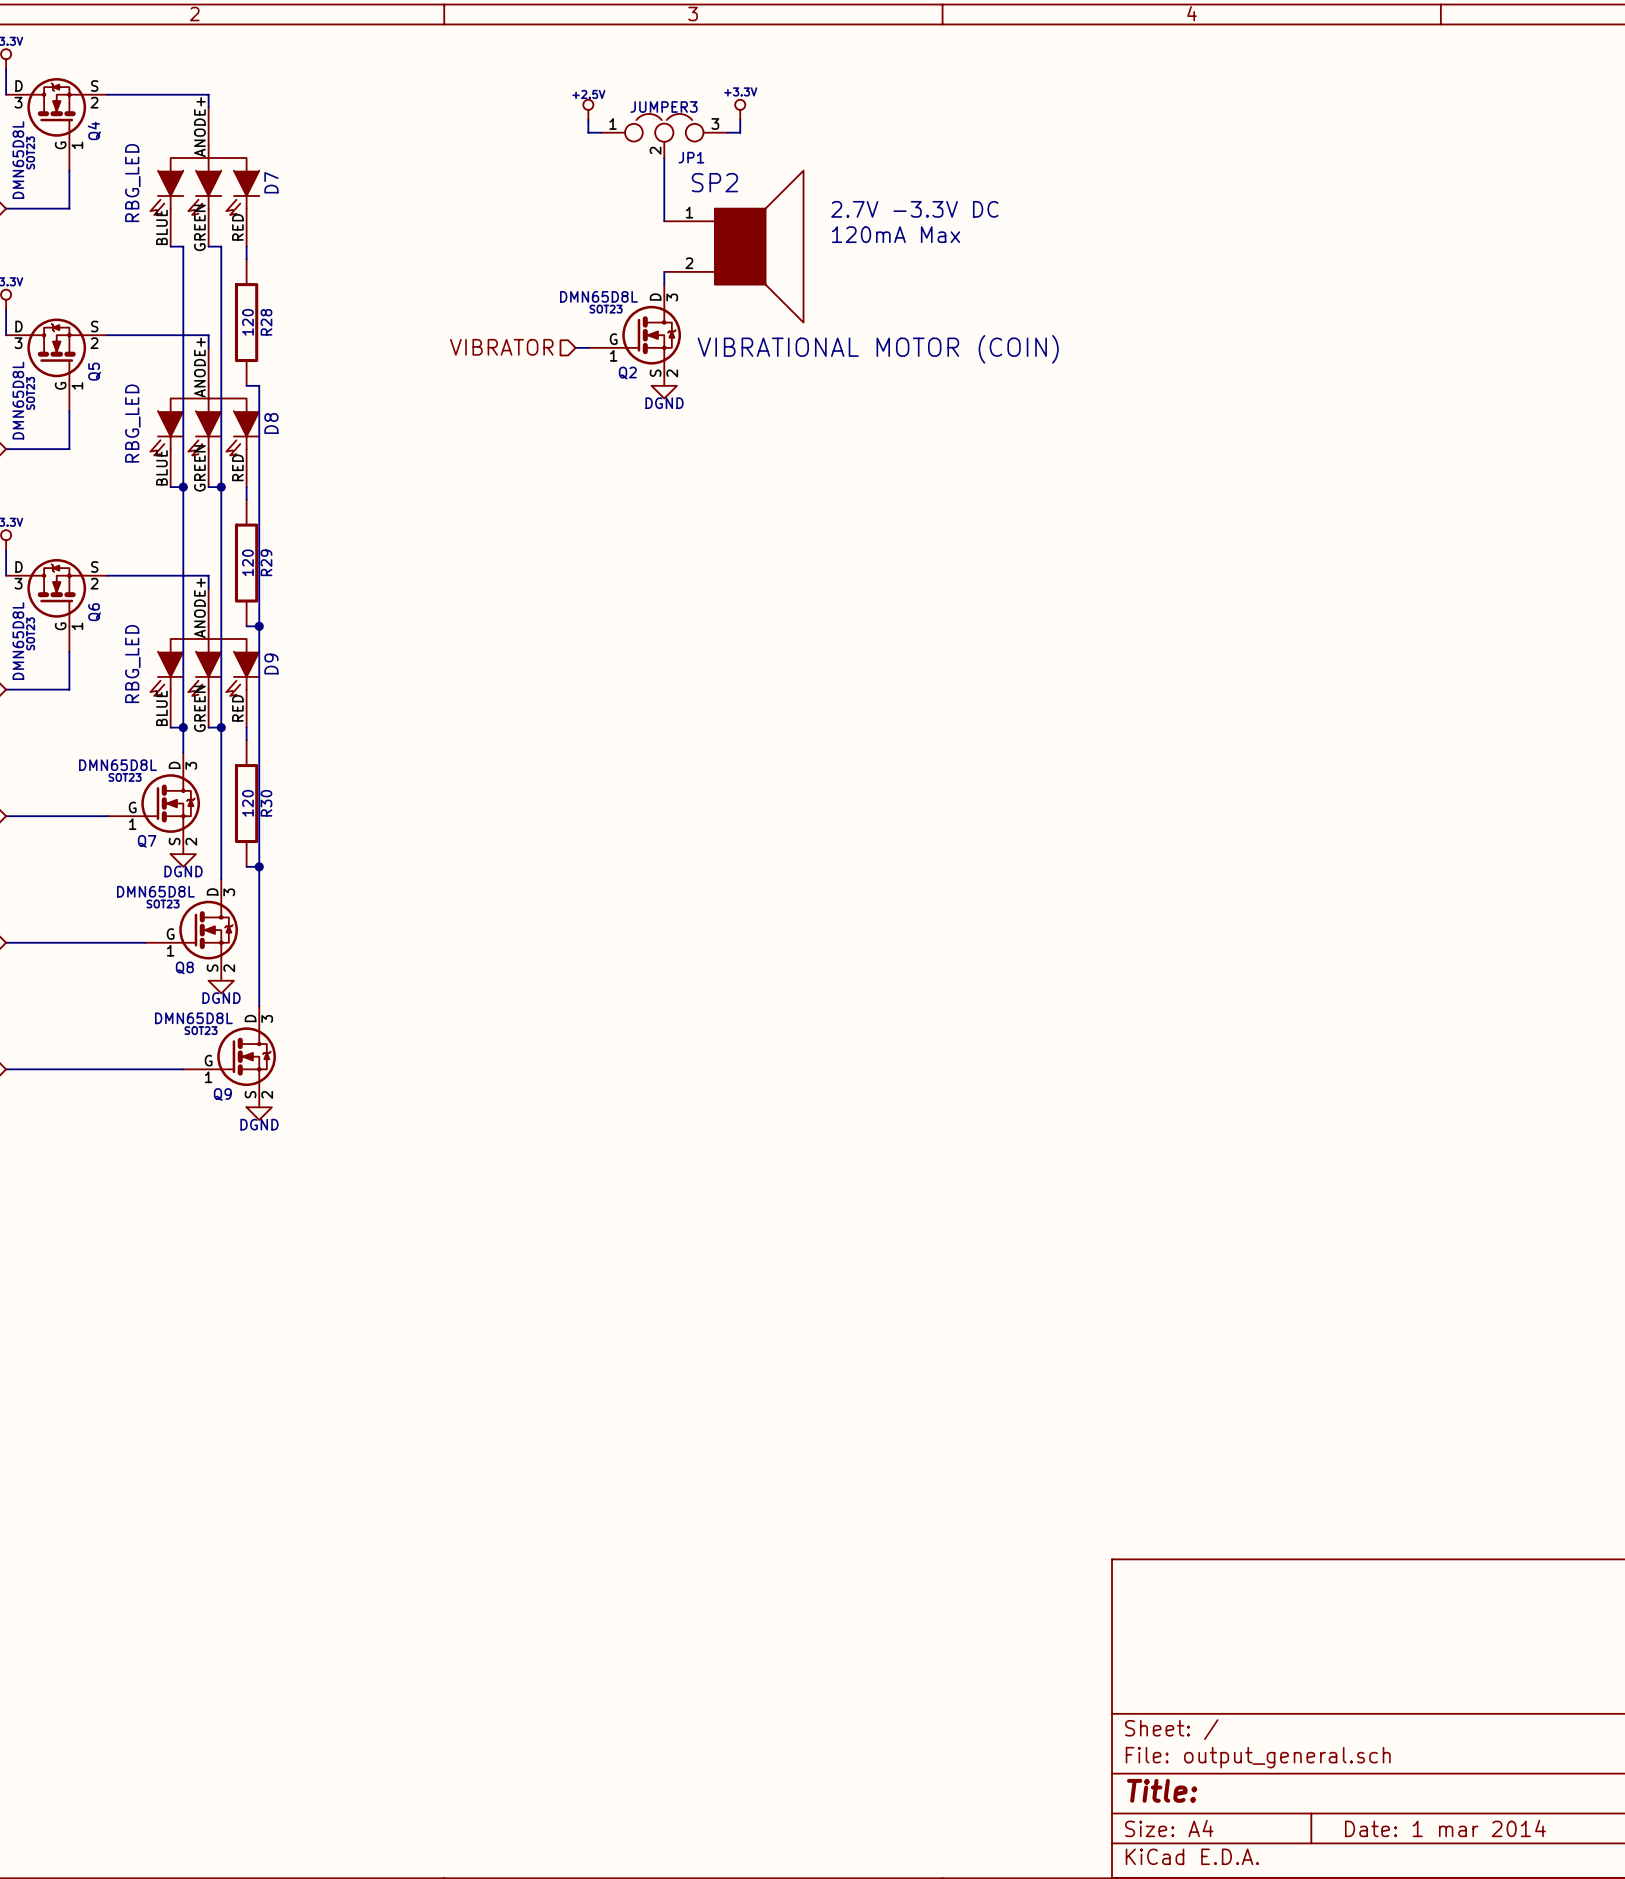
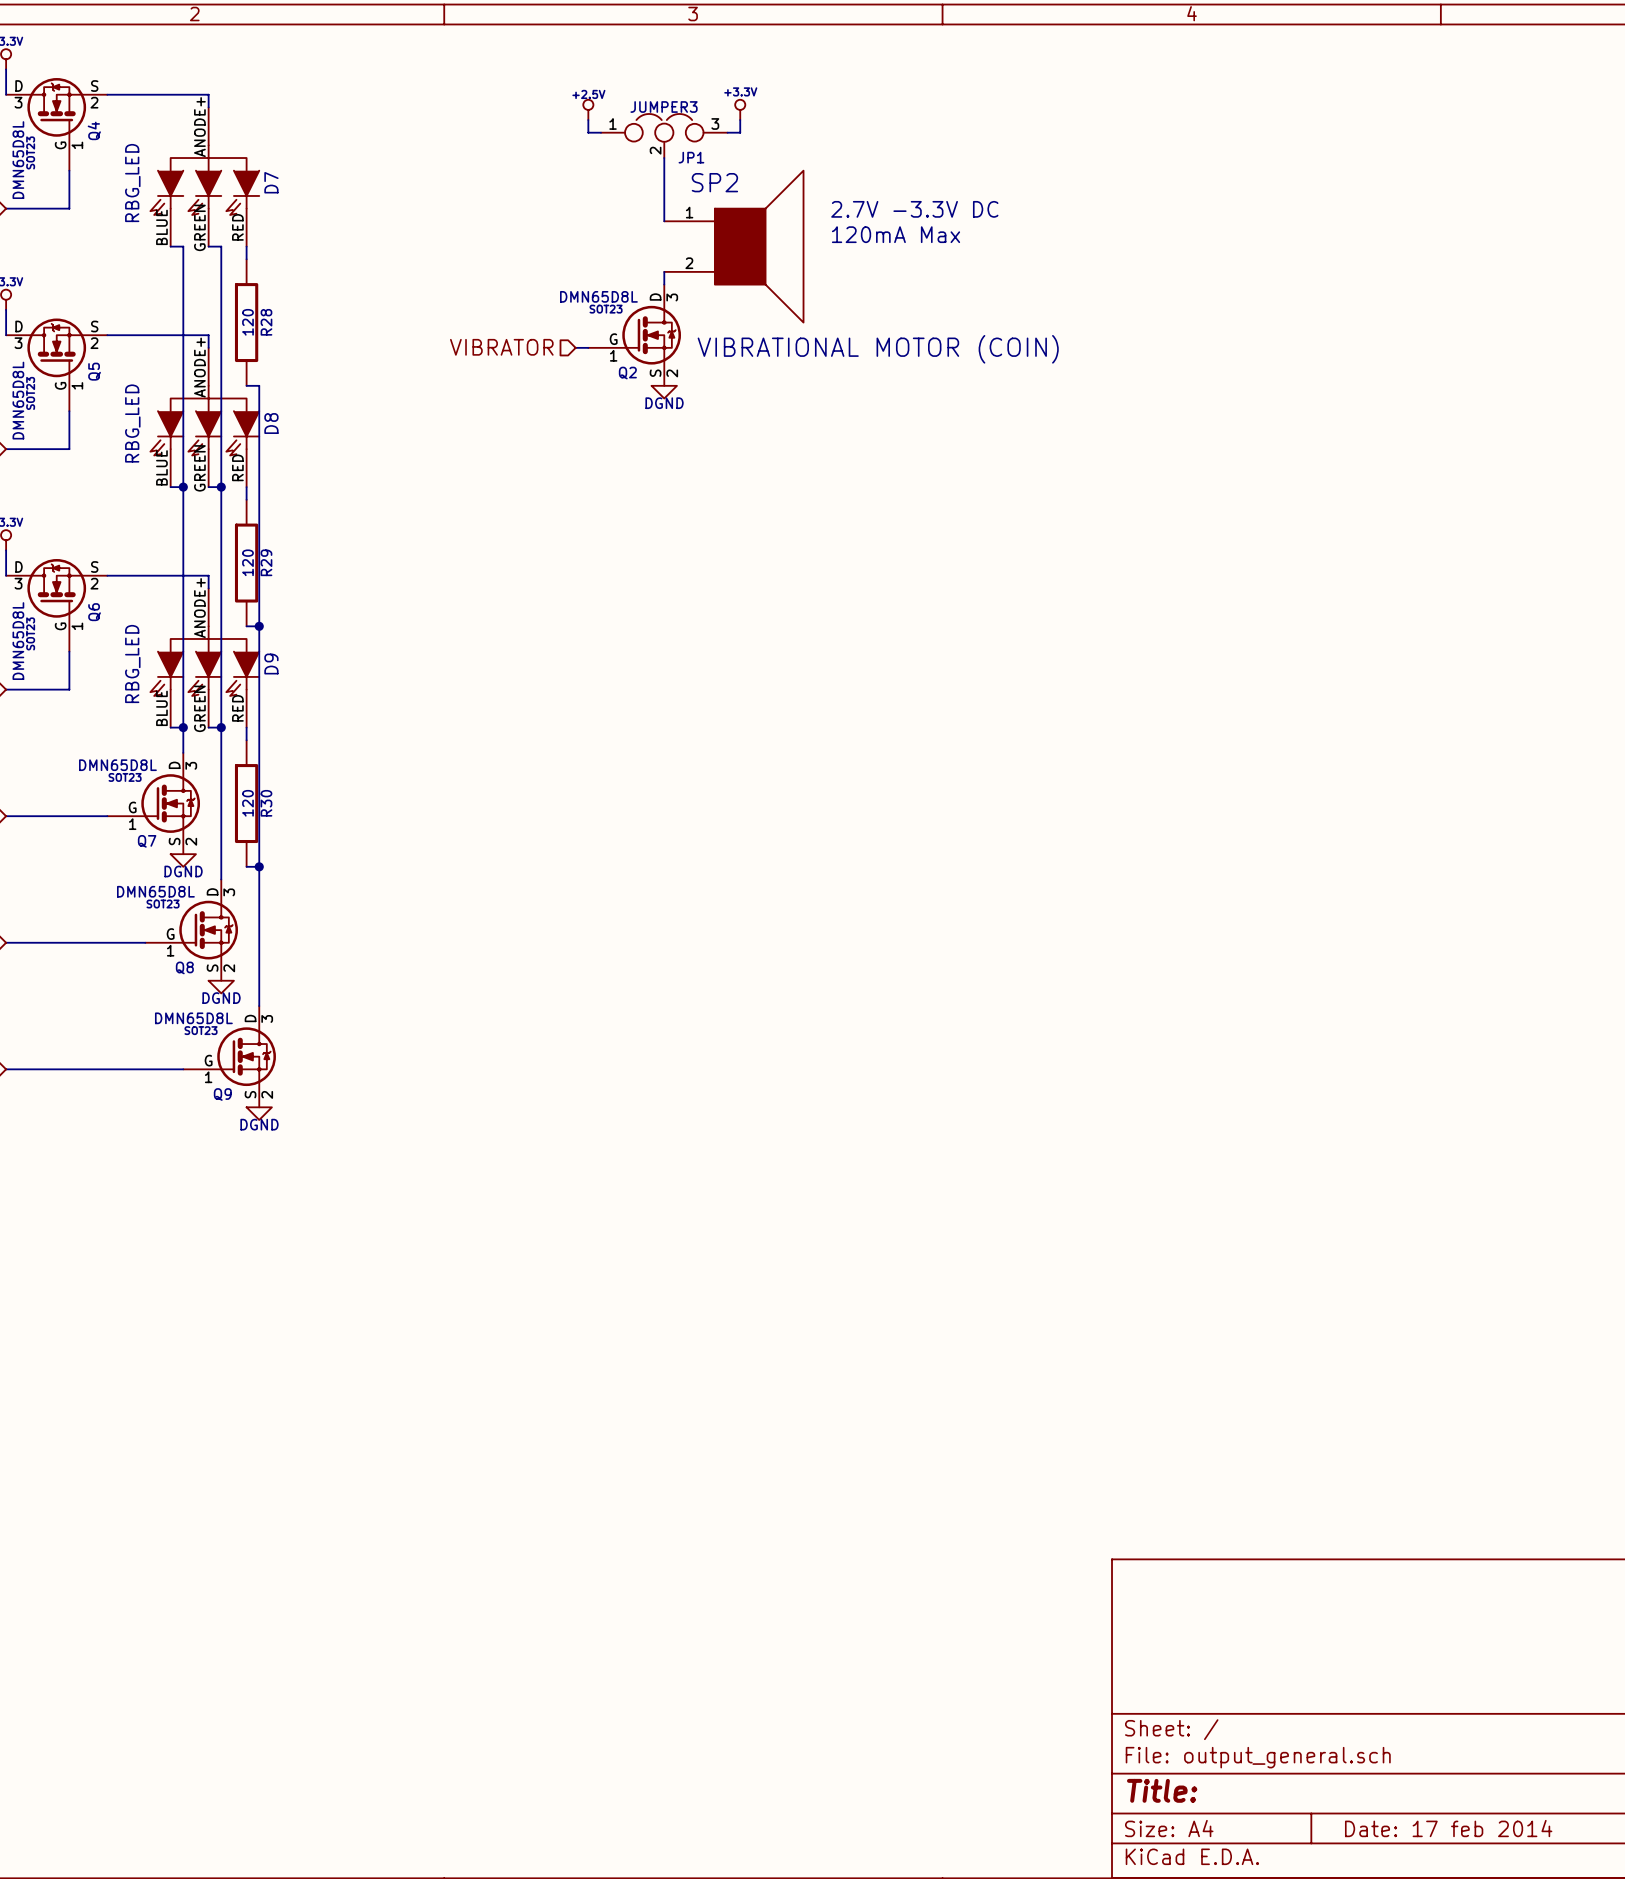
title block: Date: 1 mar 2014 (1445, 1828) -> Date: 17 feb 2014 (1448, 1828)

